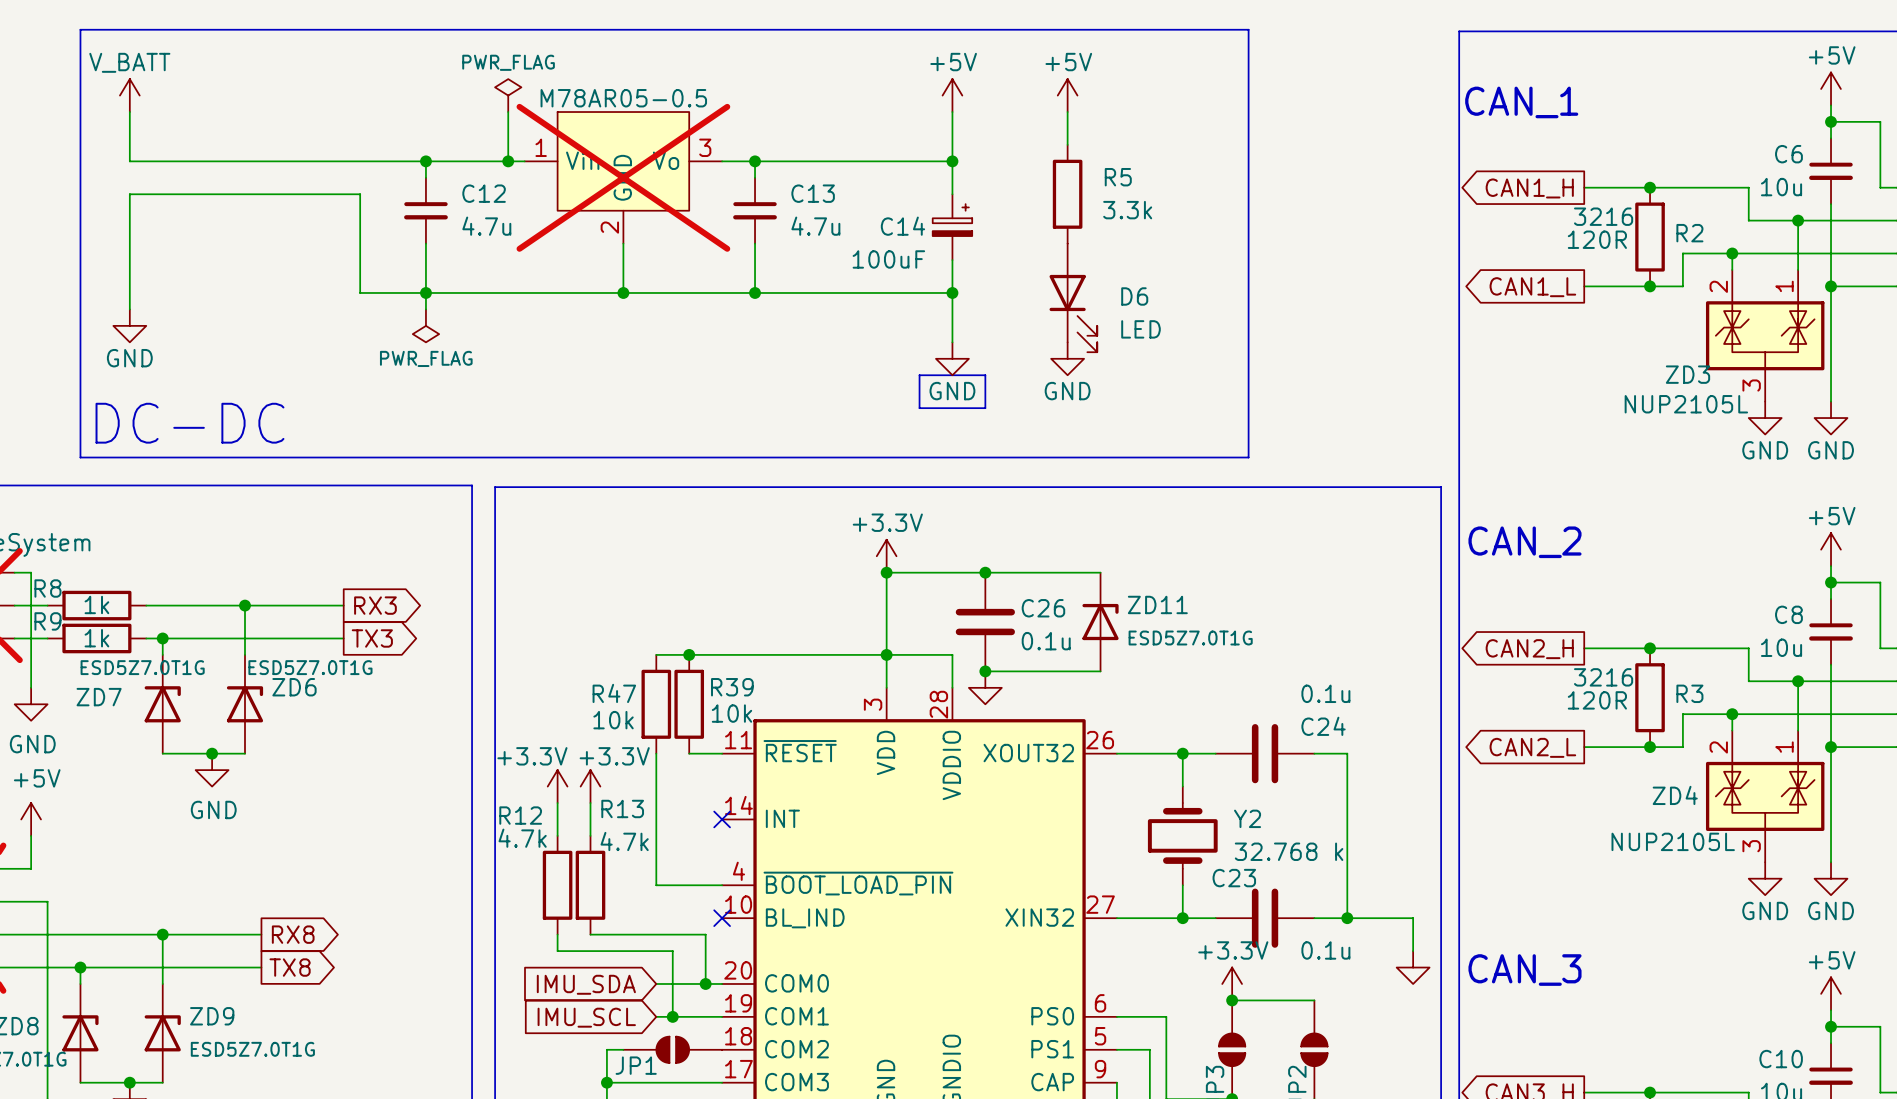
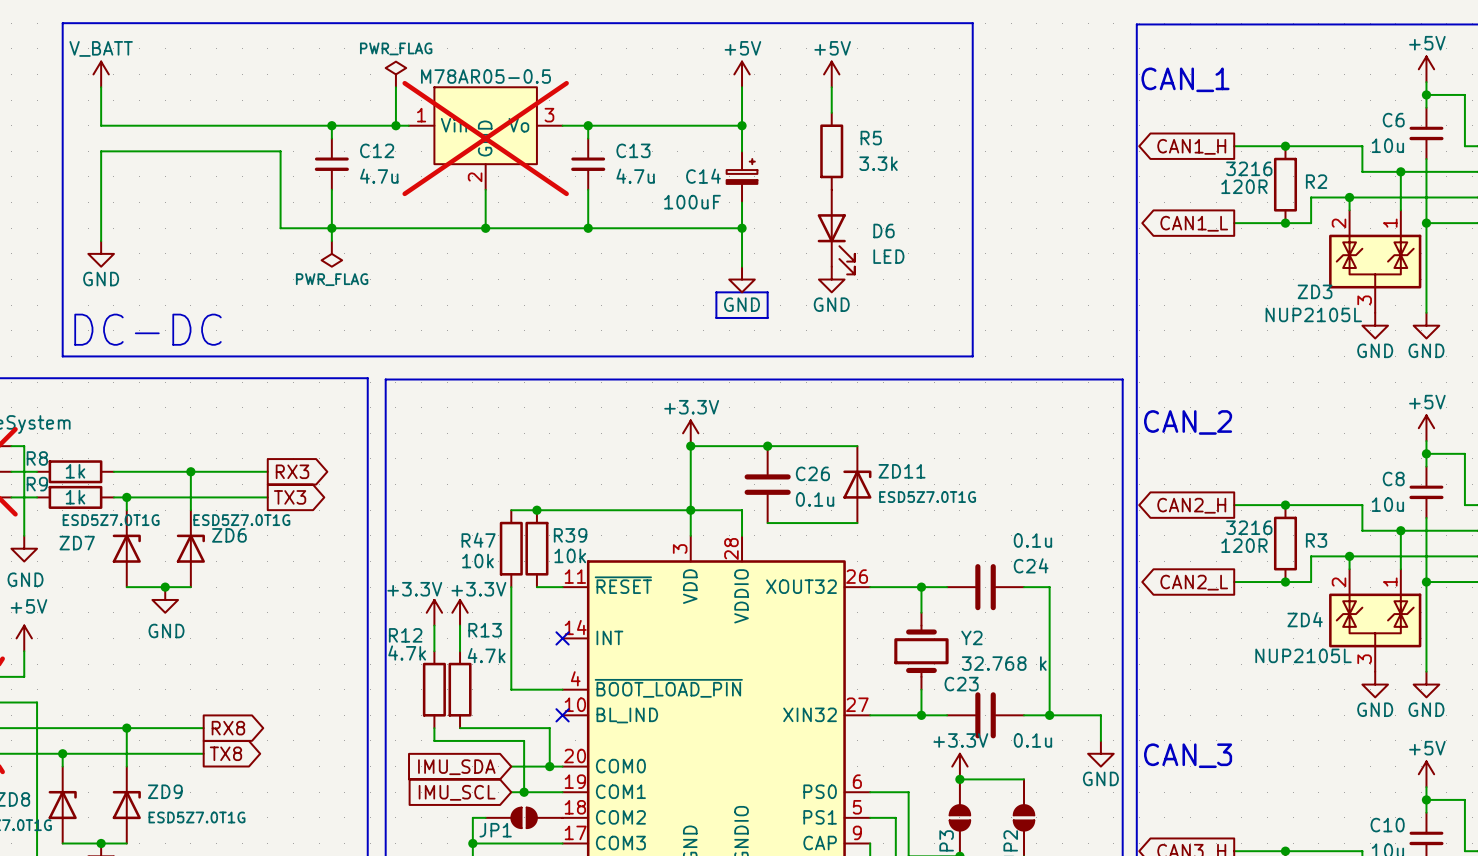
junction: (985, 671) -> none
power symbol: (985, 687) -> none
power symbol text: none -> GND (1100, 778)

